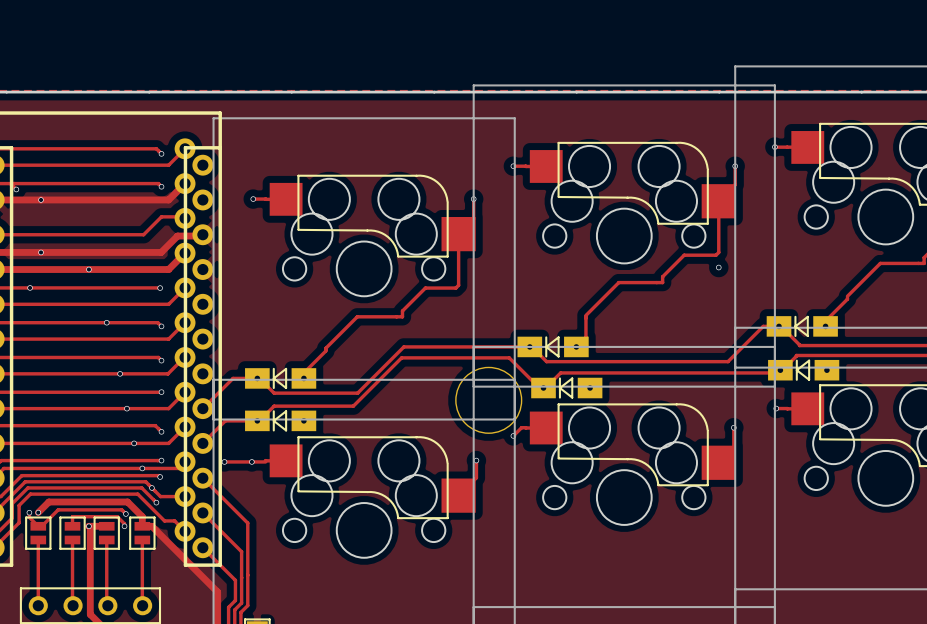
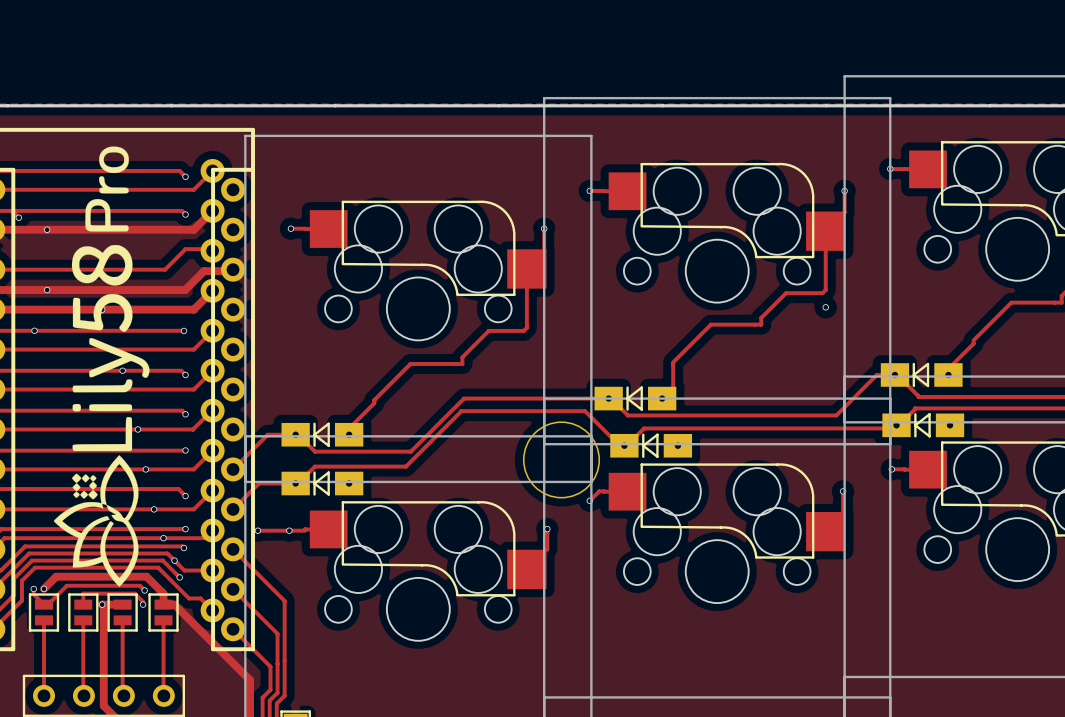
drawing: none -> [53, 146, 150, 587]

